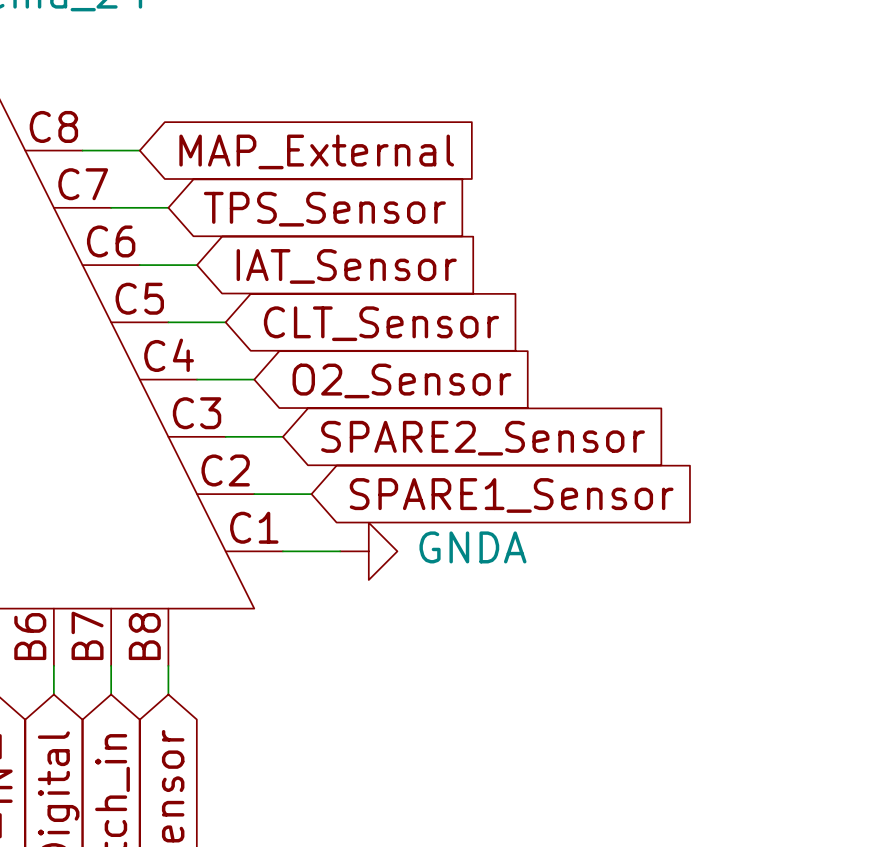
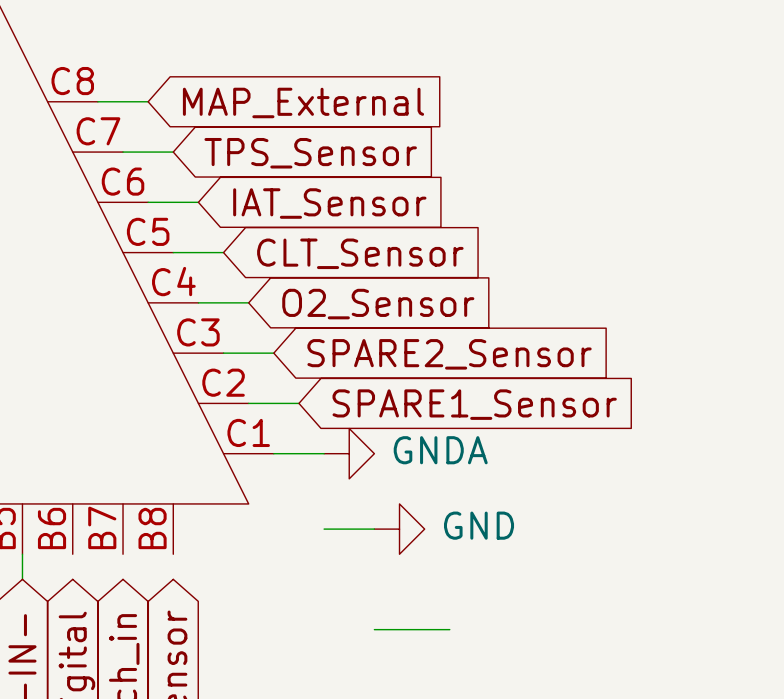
wire: none -> (324, 529) (374, 529)
power symbol: none -> GND (399, 529)
wire: (53, 665) (53, 694) -> none
wire: (111, 665) (111, 694) -> none
wire: (168, 665) (168, 694) -> none
wire: none -> (374, 629) (449, 629)

